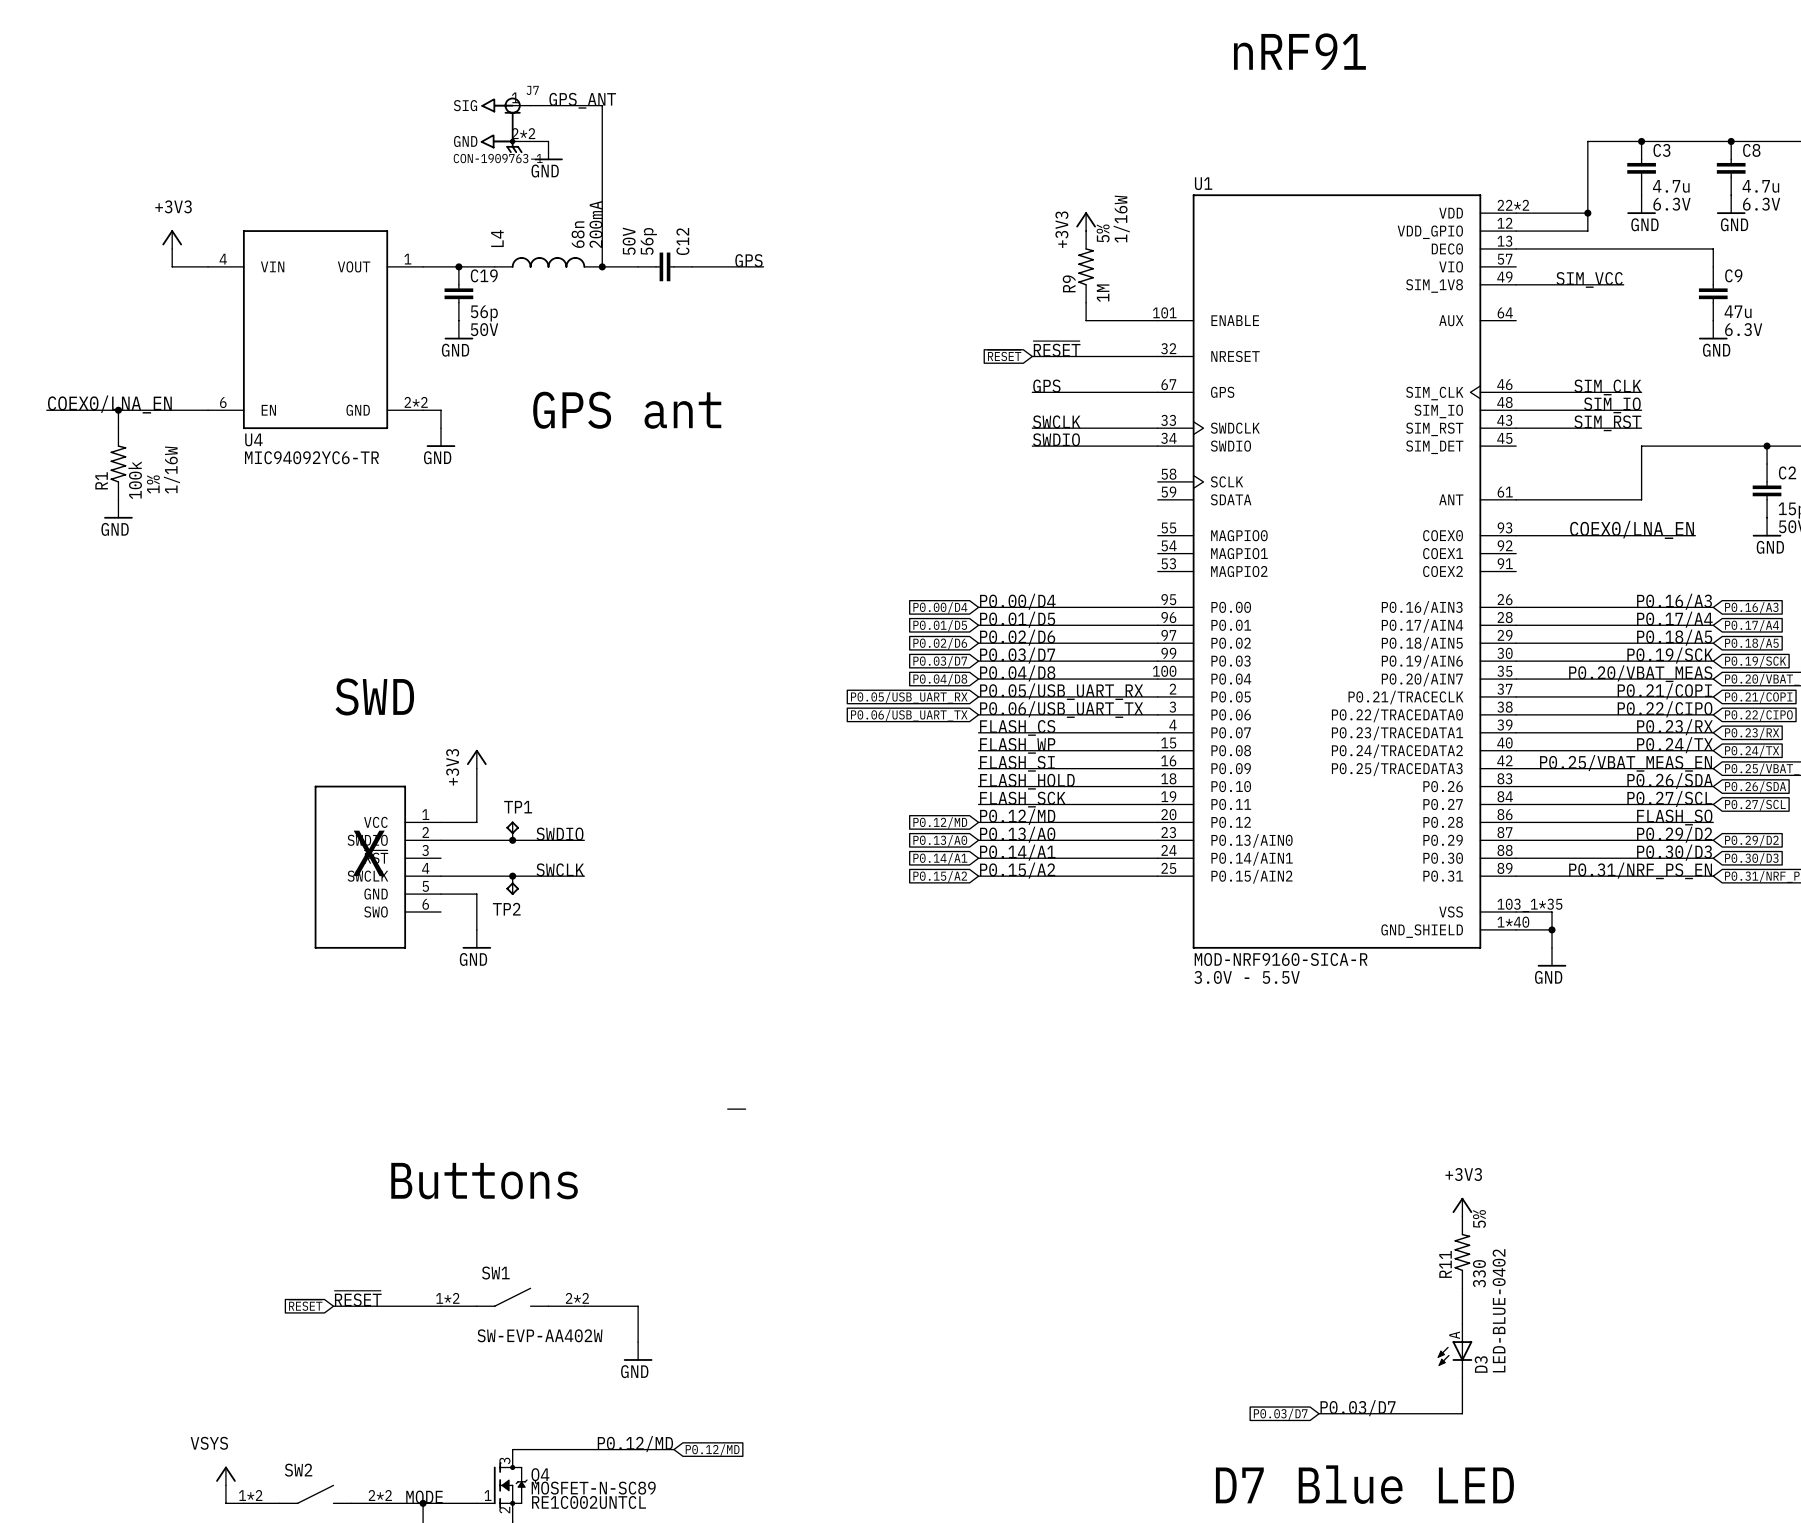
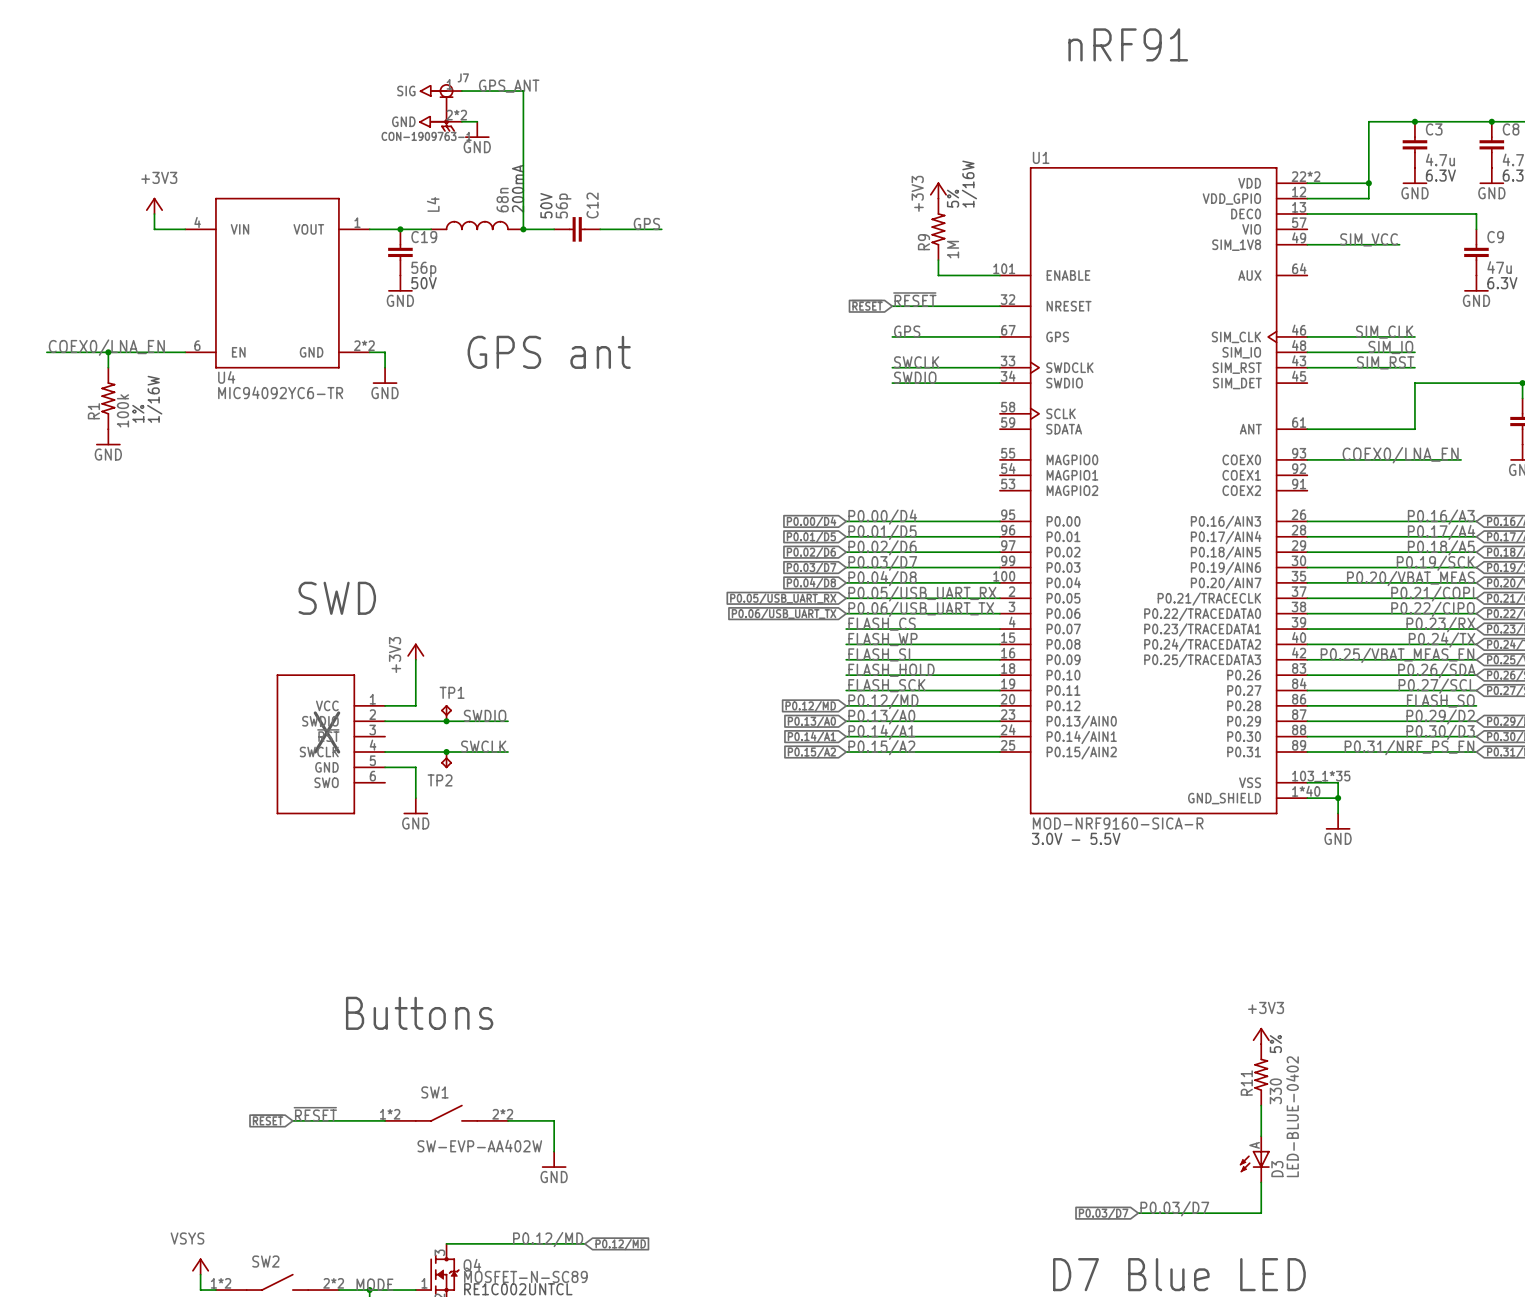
wire: (727, 1109) (745, 1109) -> none

